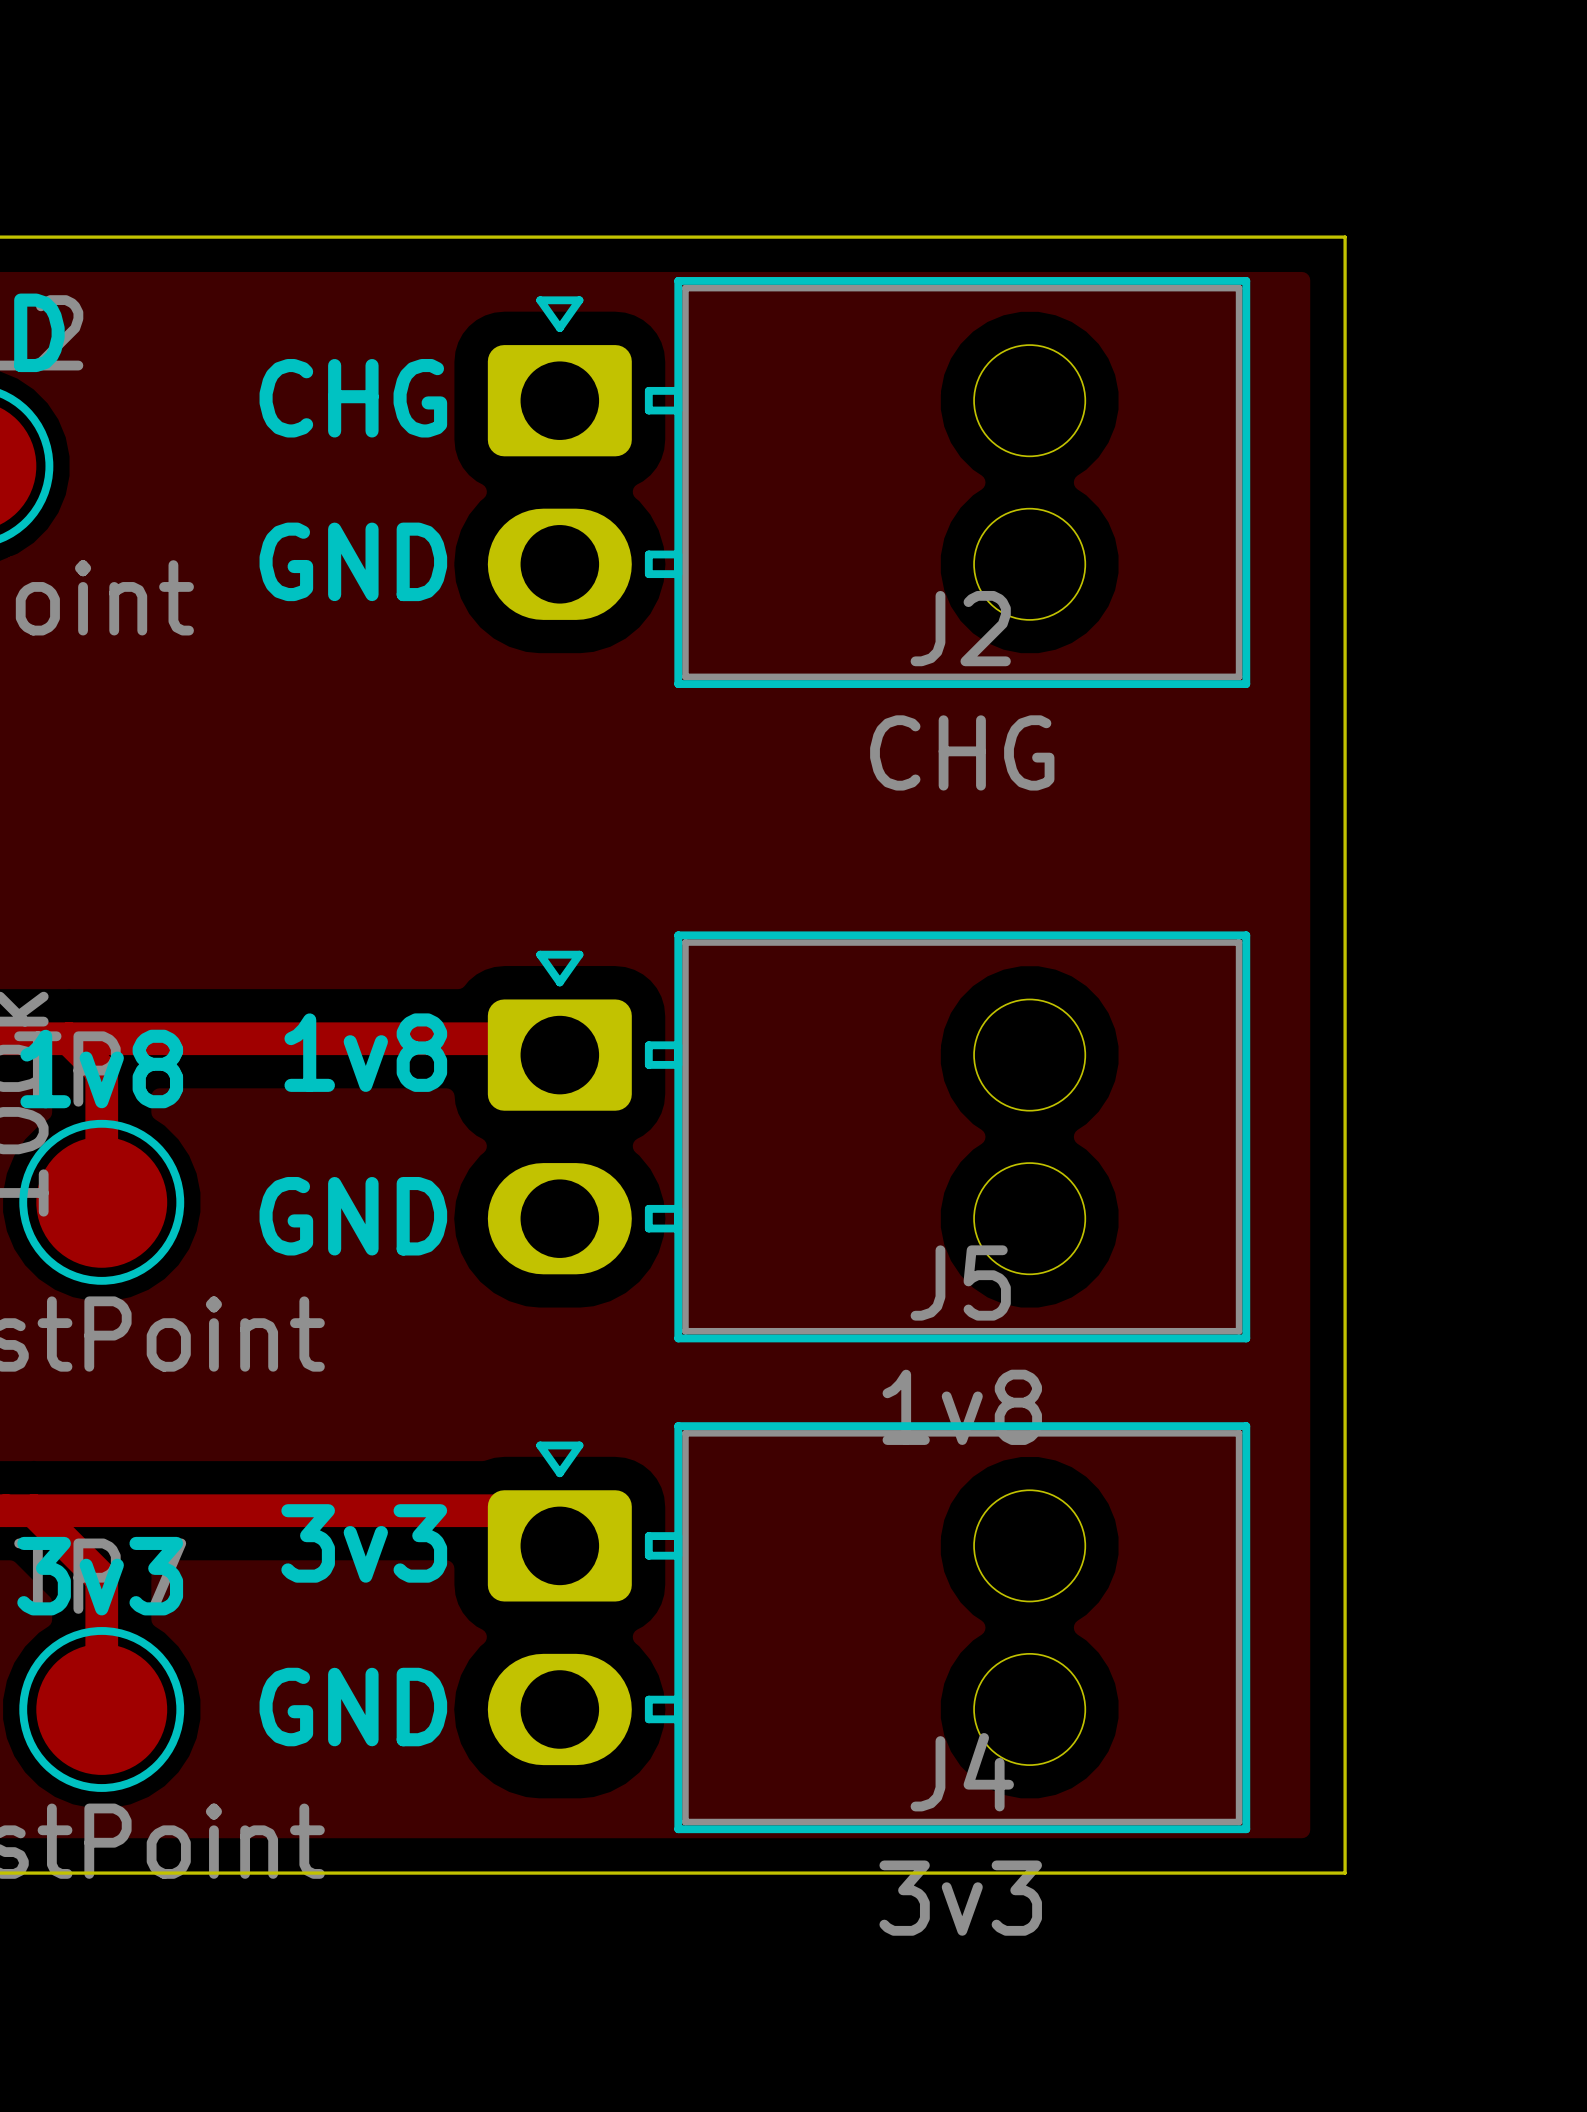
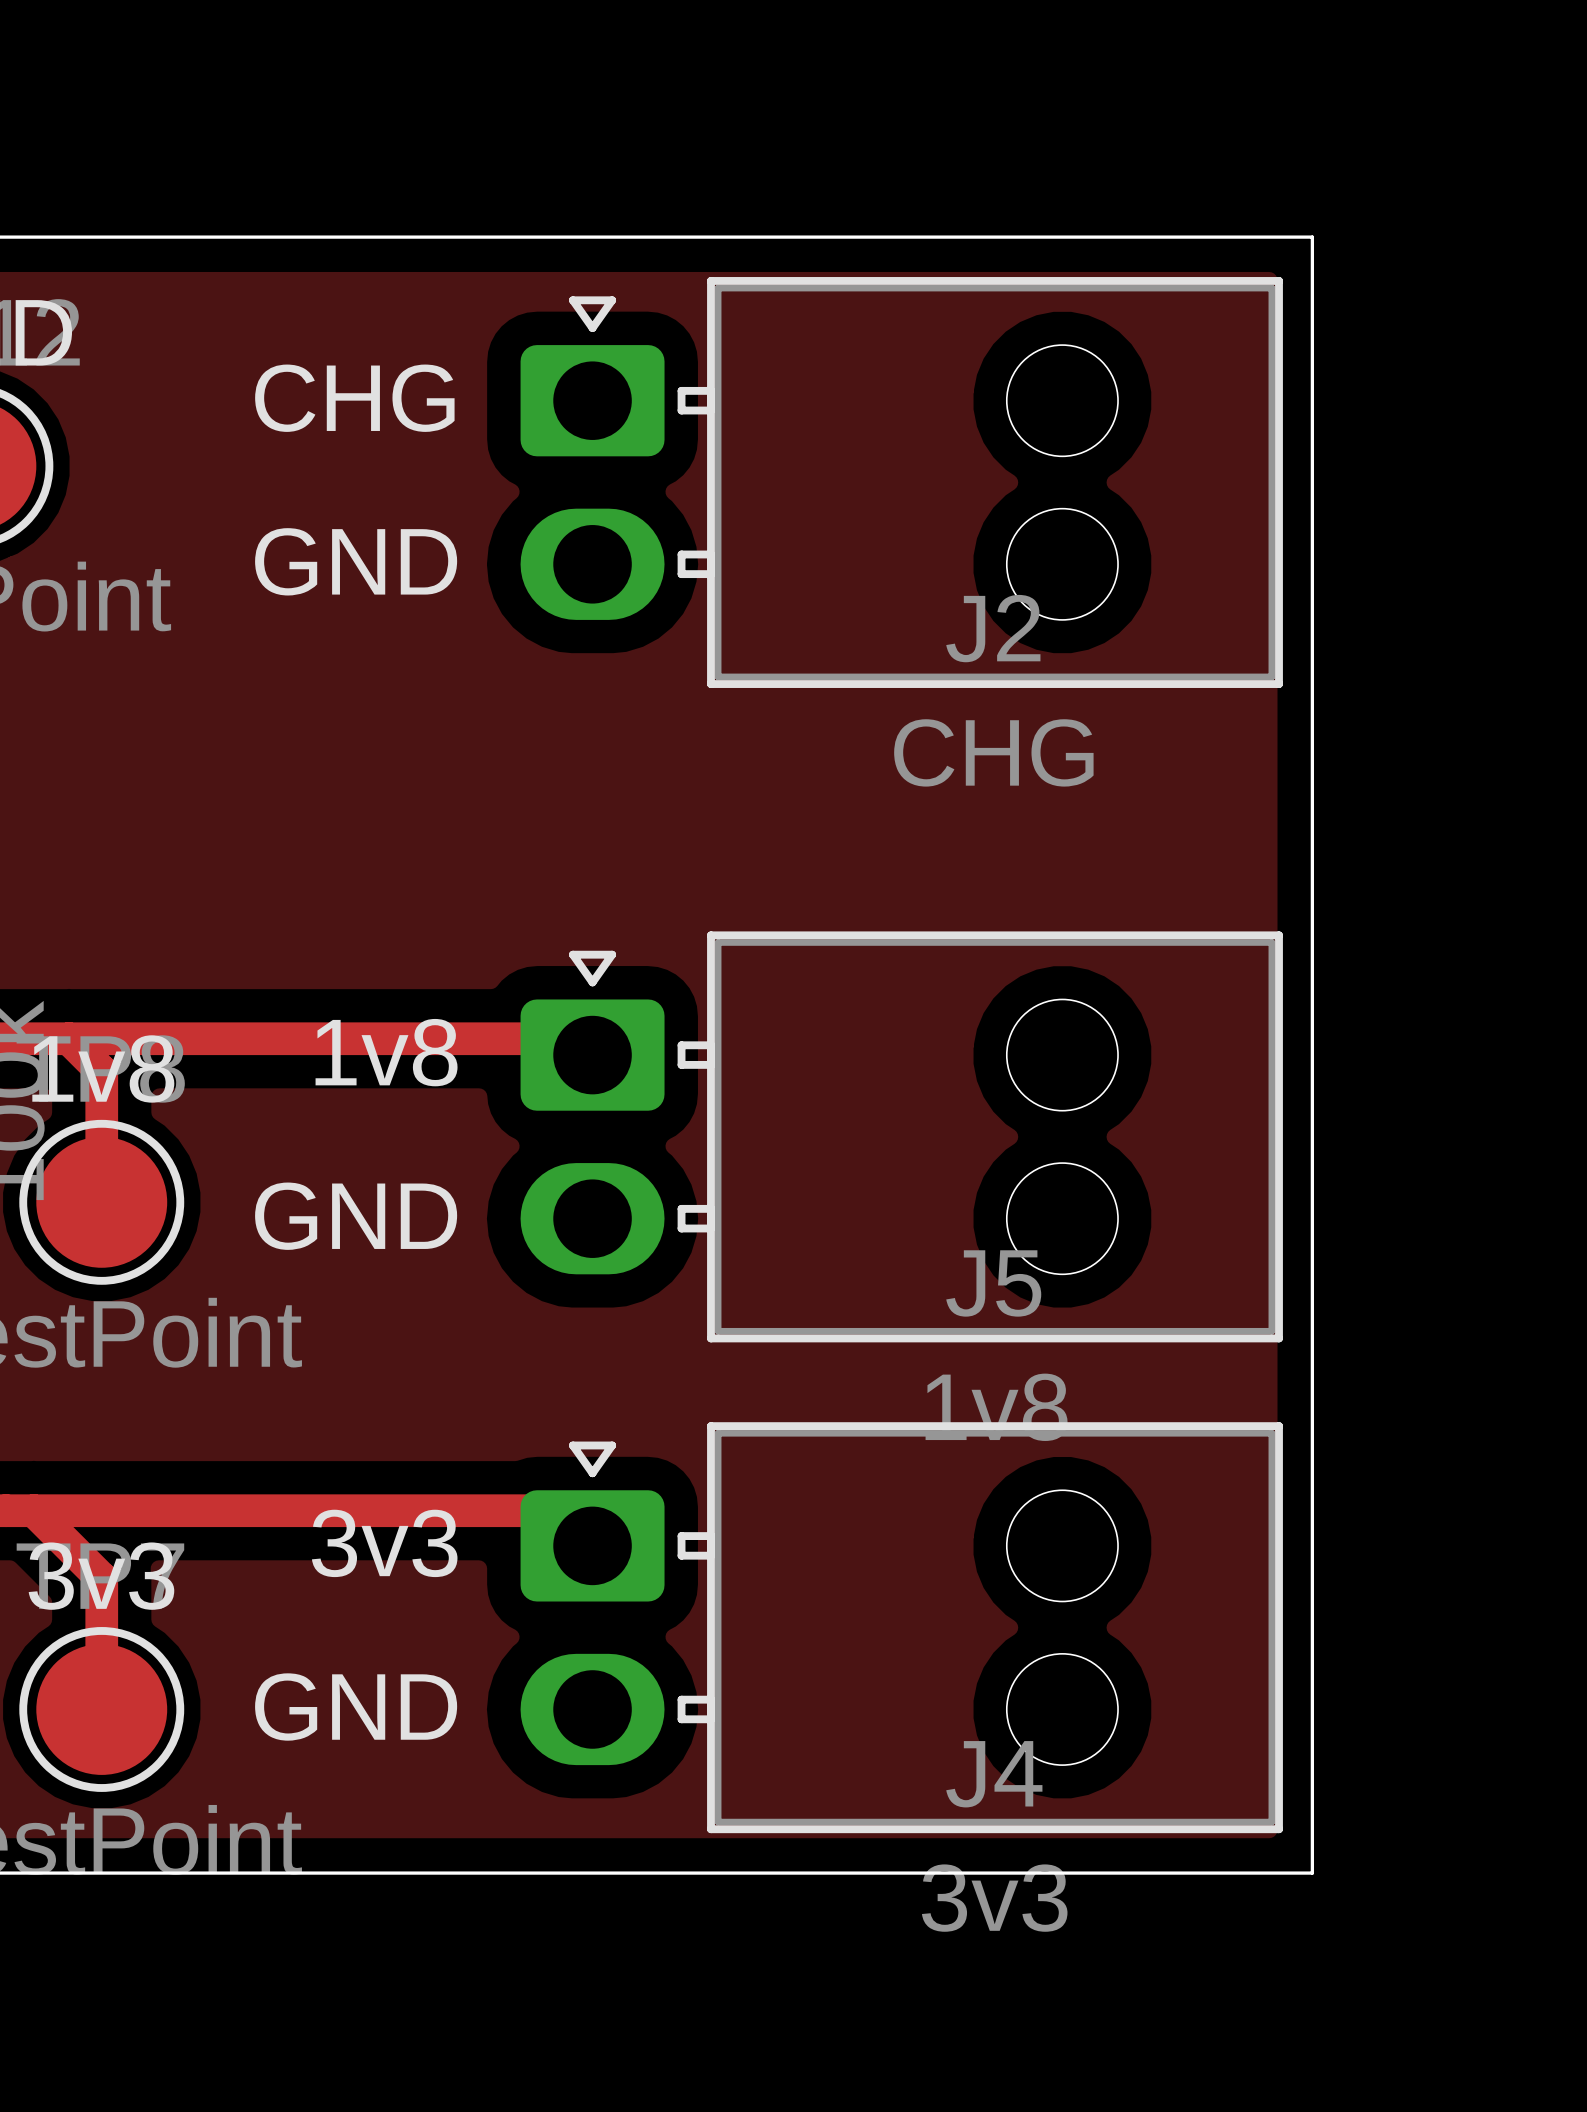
board edge: (1312, 237) (1345, 237) (1345, 1873) (1312, 1873) -> (1312, 237) (1312, 1873)
J2 position: (869, 482) -> (901, 482)
J5 position: (869, 1136) -> (901, 1136)
J4 position: (869, 1627) -> (901, 1627)

